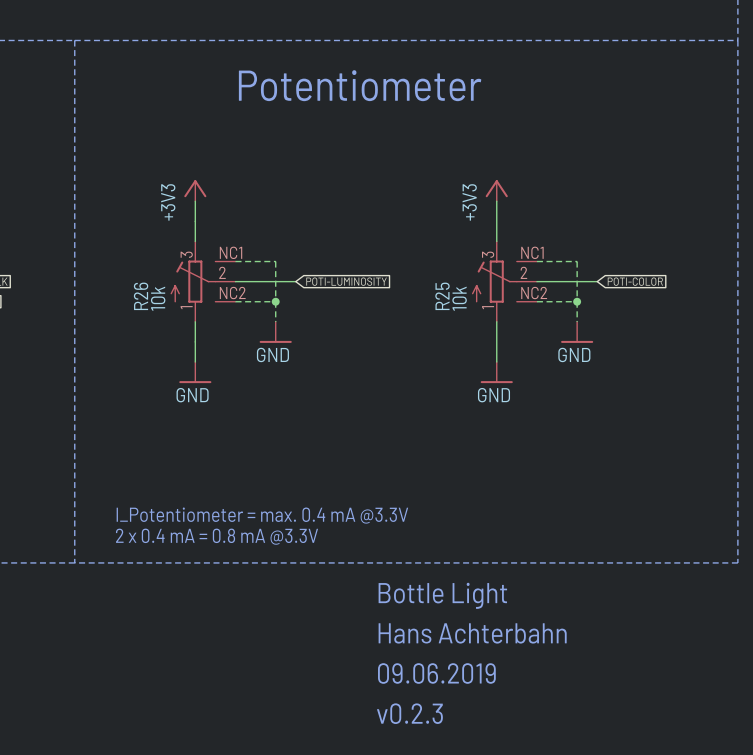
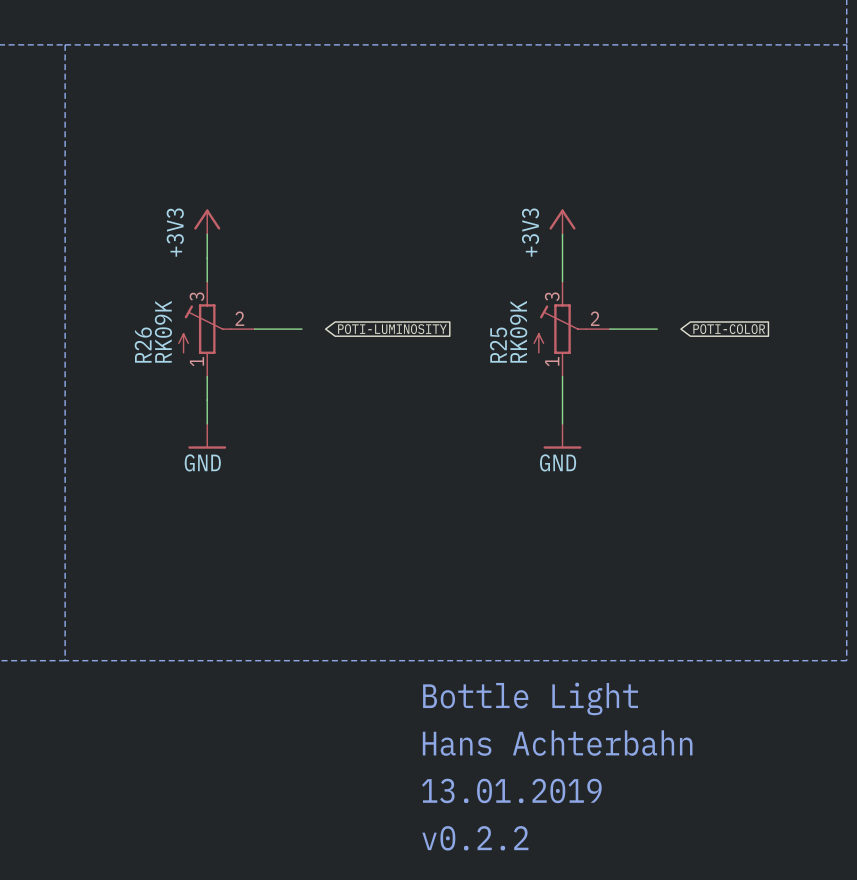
text: Potentiometer (360, 85) -> none
R26 symbol: [170, 241, 236, 322] -> [178, 281, 255, 377]
R25 symbol: [472, 241, 537, 322] -> [533, 281, 610, 377]
wire: (235, 261) (275, 261) (275, 321) -> none
wire: (536, 261) (577, 261) (577, 321) -> none
wire: (275, 281) (295, 281) -> none
wire: (577, 281) (597, 281) -> none
R26 value: 10k (158, 298) -> RK09K (163, 331)
R25 value: 10k (459, 298) -> RK09K (518, 331)
wire: (235, 301) (275, 301) -> none
junction: (275, 301) -> none
wire: (536, 301) (577, 301) -> none
junction: (577, 301) -> none
power symbol: GND (275, 332) -> none
power symbol: GND (577, 332) -> none
text: I_Potentiometer = max. 0.4 mA @3.3V (262, 515) -> none
text: 2 x 0.4 mA = 0.8 mA @3.3V (217, 536) -> none
text: 09.06.2019 (436, 673) -> 13.01.2019 (511, 790)
text: v0.2.3 (409, 713) -> v0.2.2 (475, 838)

